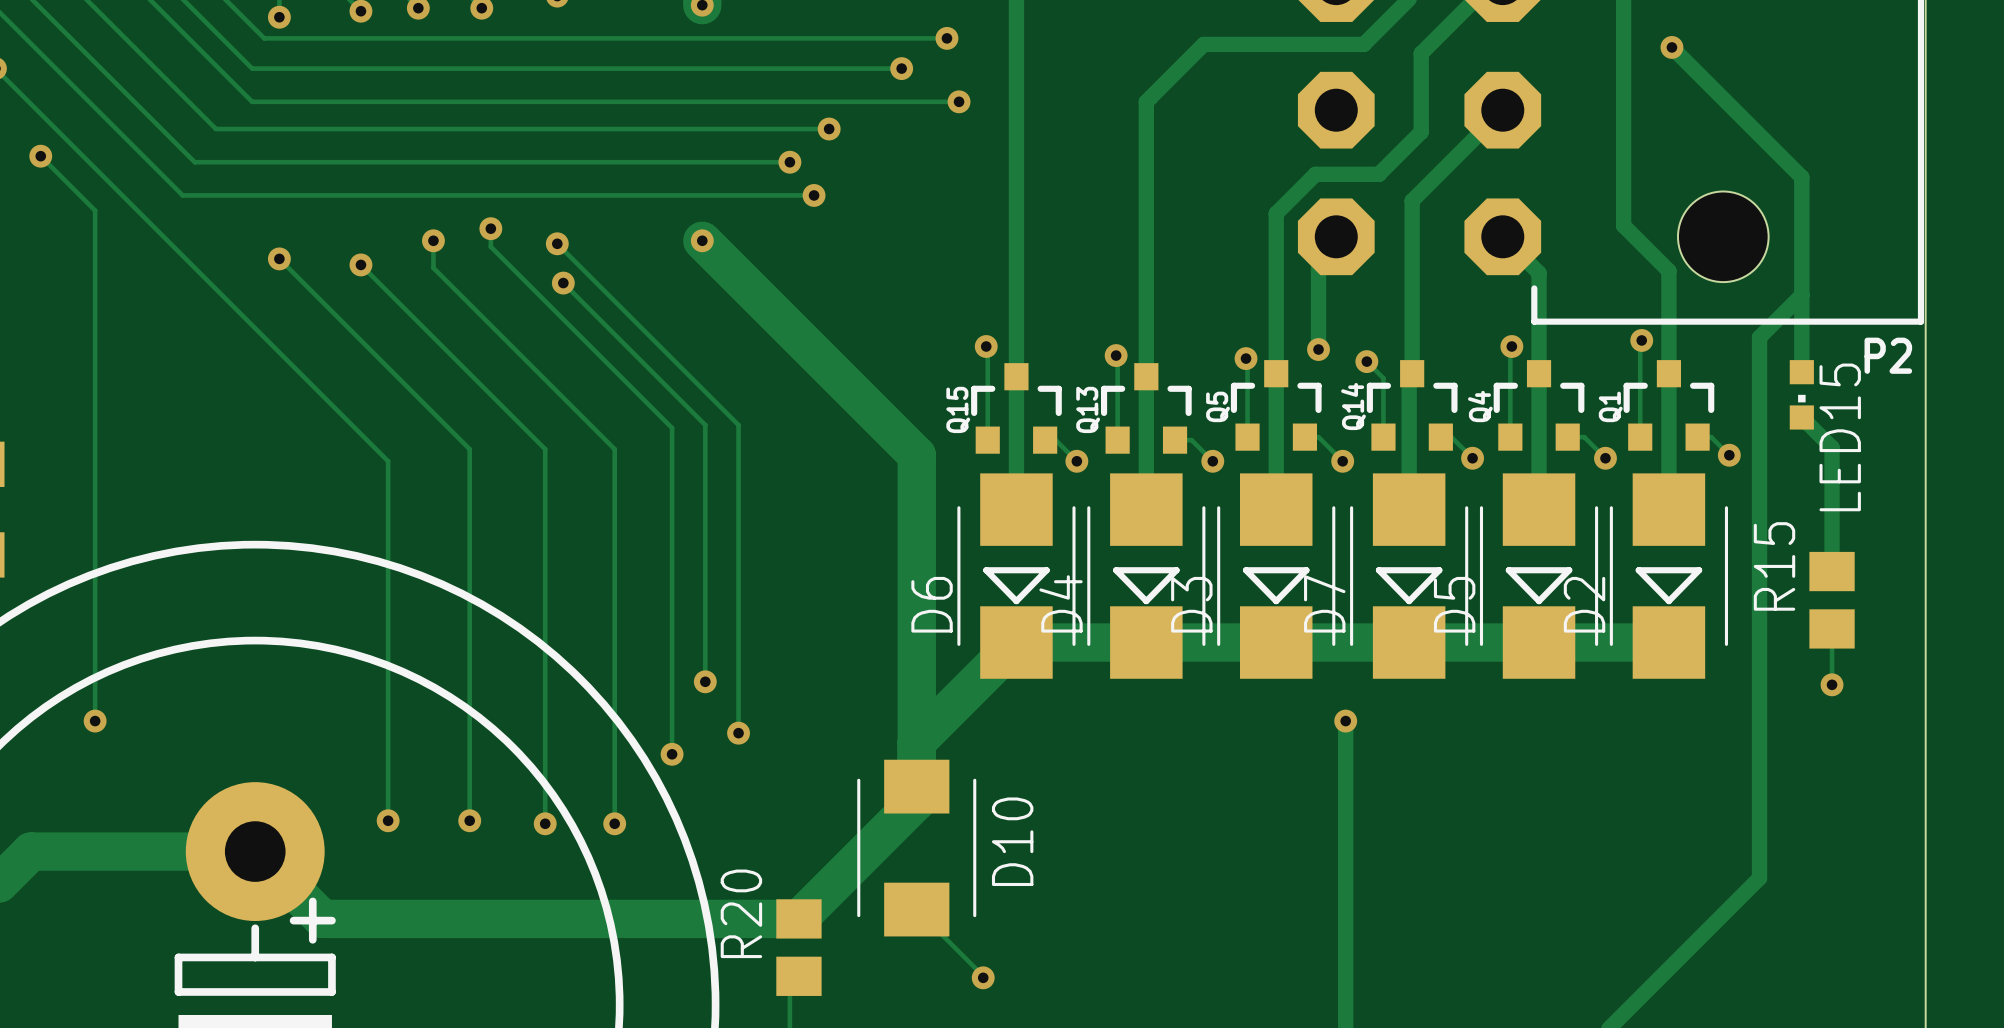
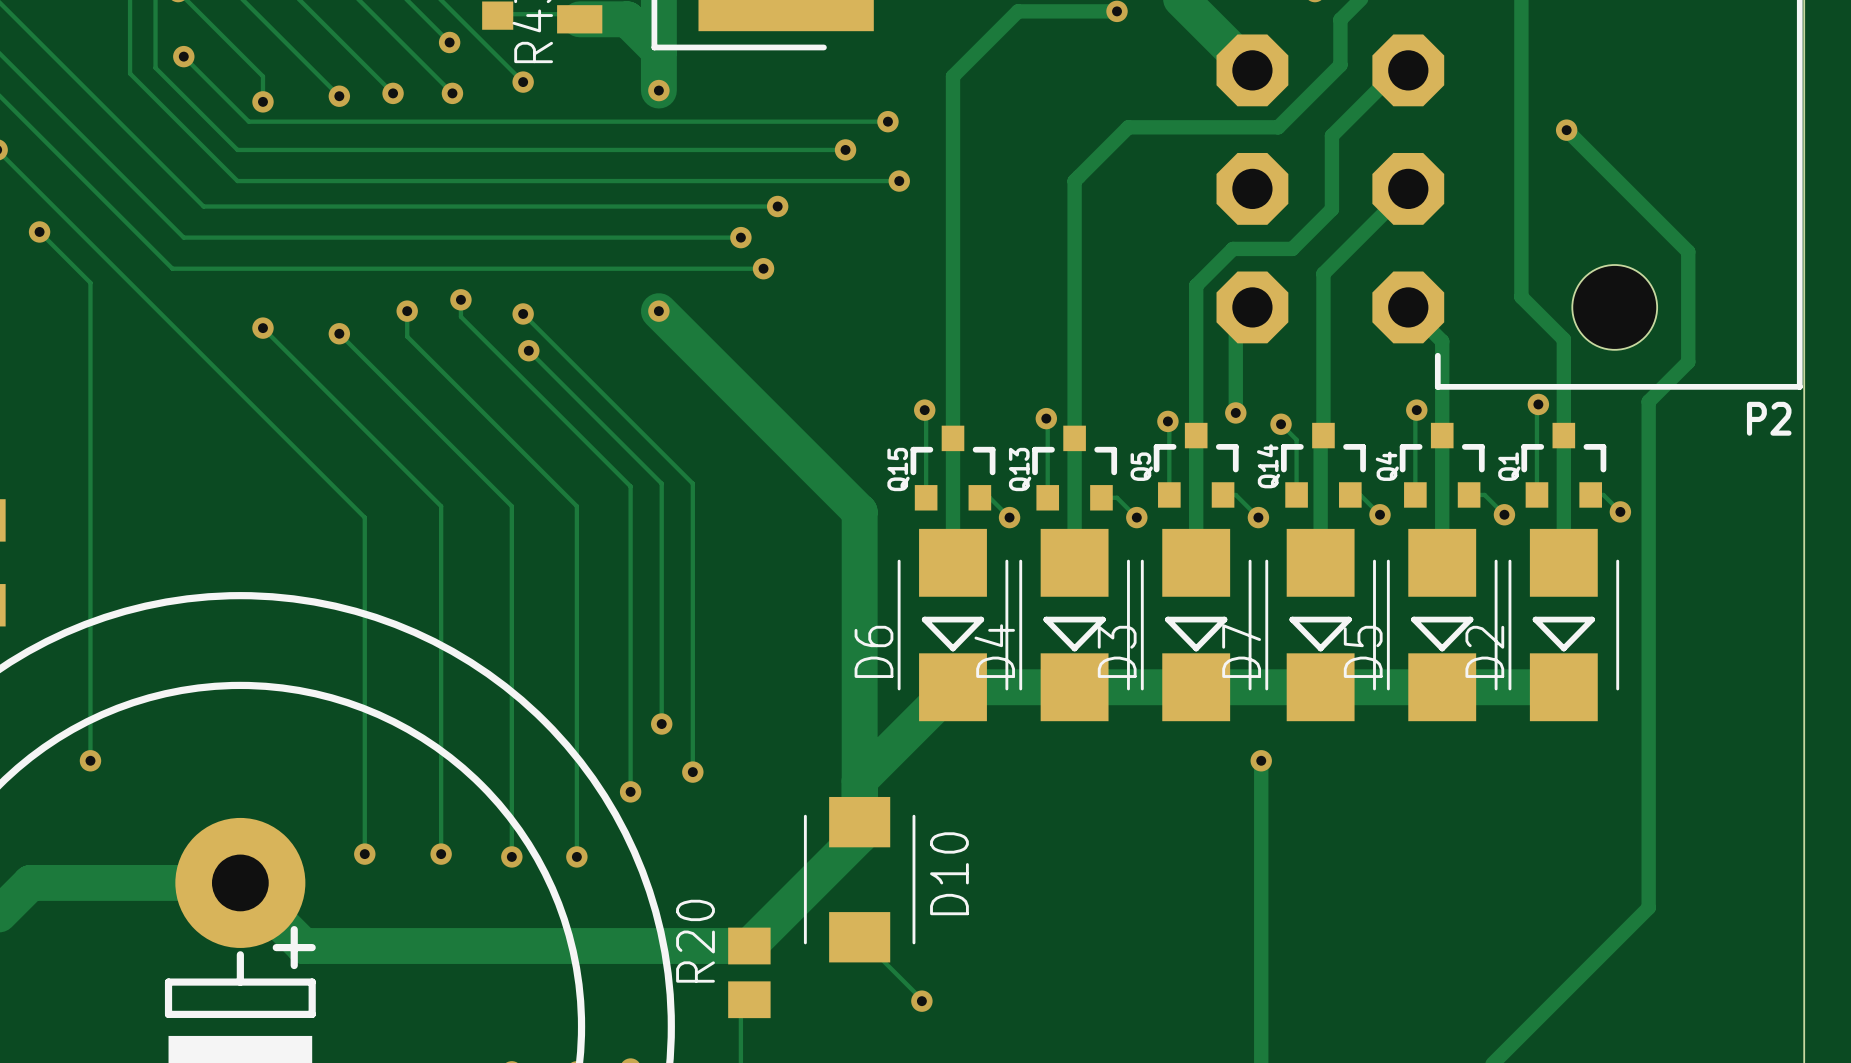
track: (1801, 295) (1801, 372) -> none
LED15: (1801, 394) -> none
track: (1801, 417) (1832, 447) (1832, 571) -> none
R15: (1832, 600) -> none
track: (1832, 628) (1832, 684) -> none
via: (1832, 684) -> none

